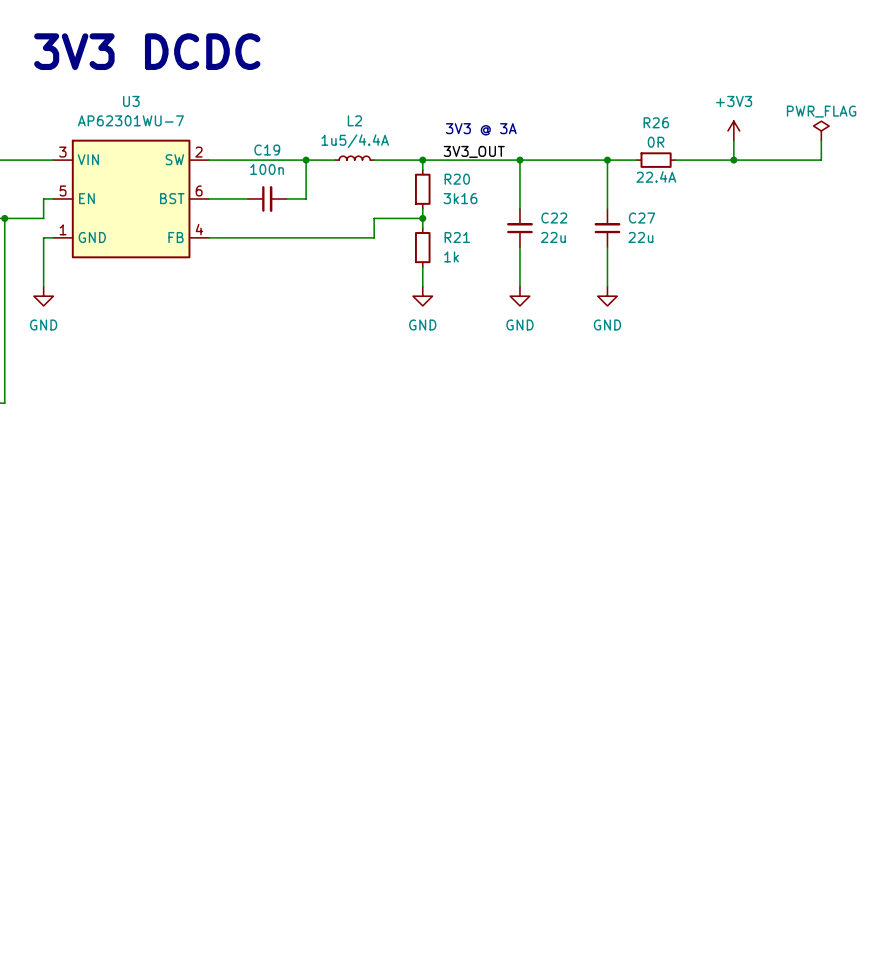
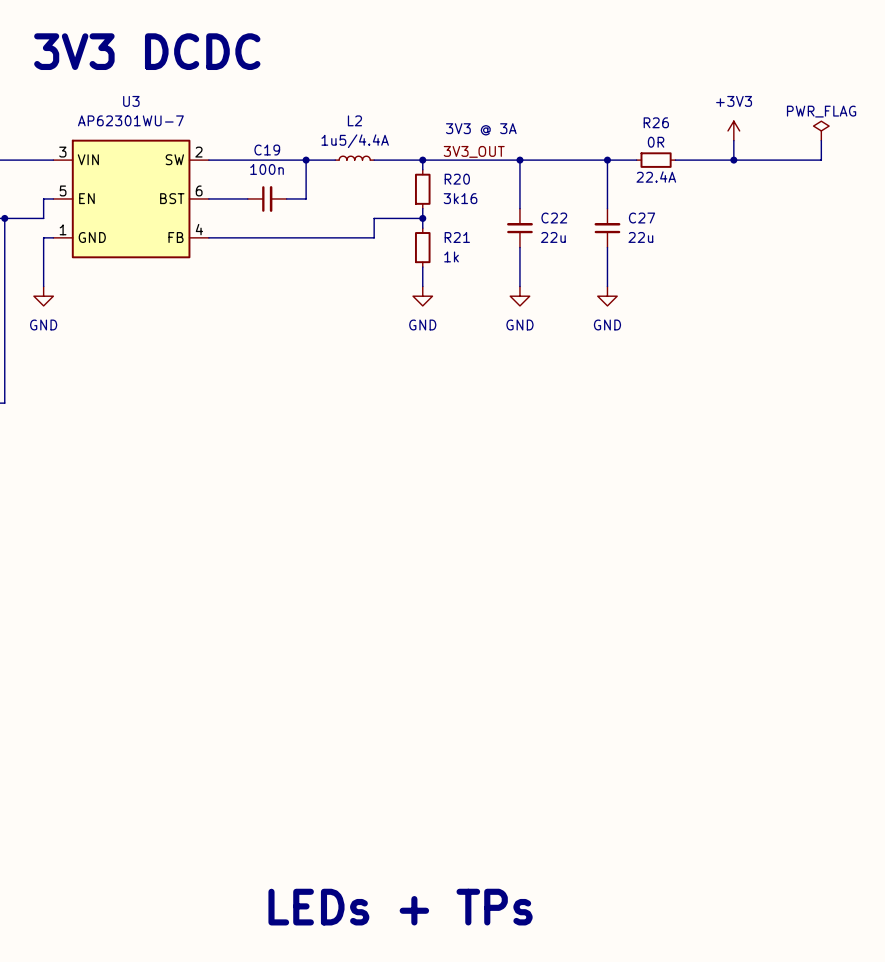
text: none -> LEDs + TPs (400, 907)

